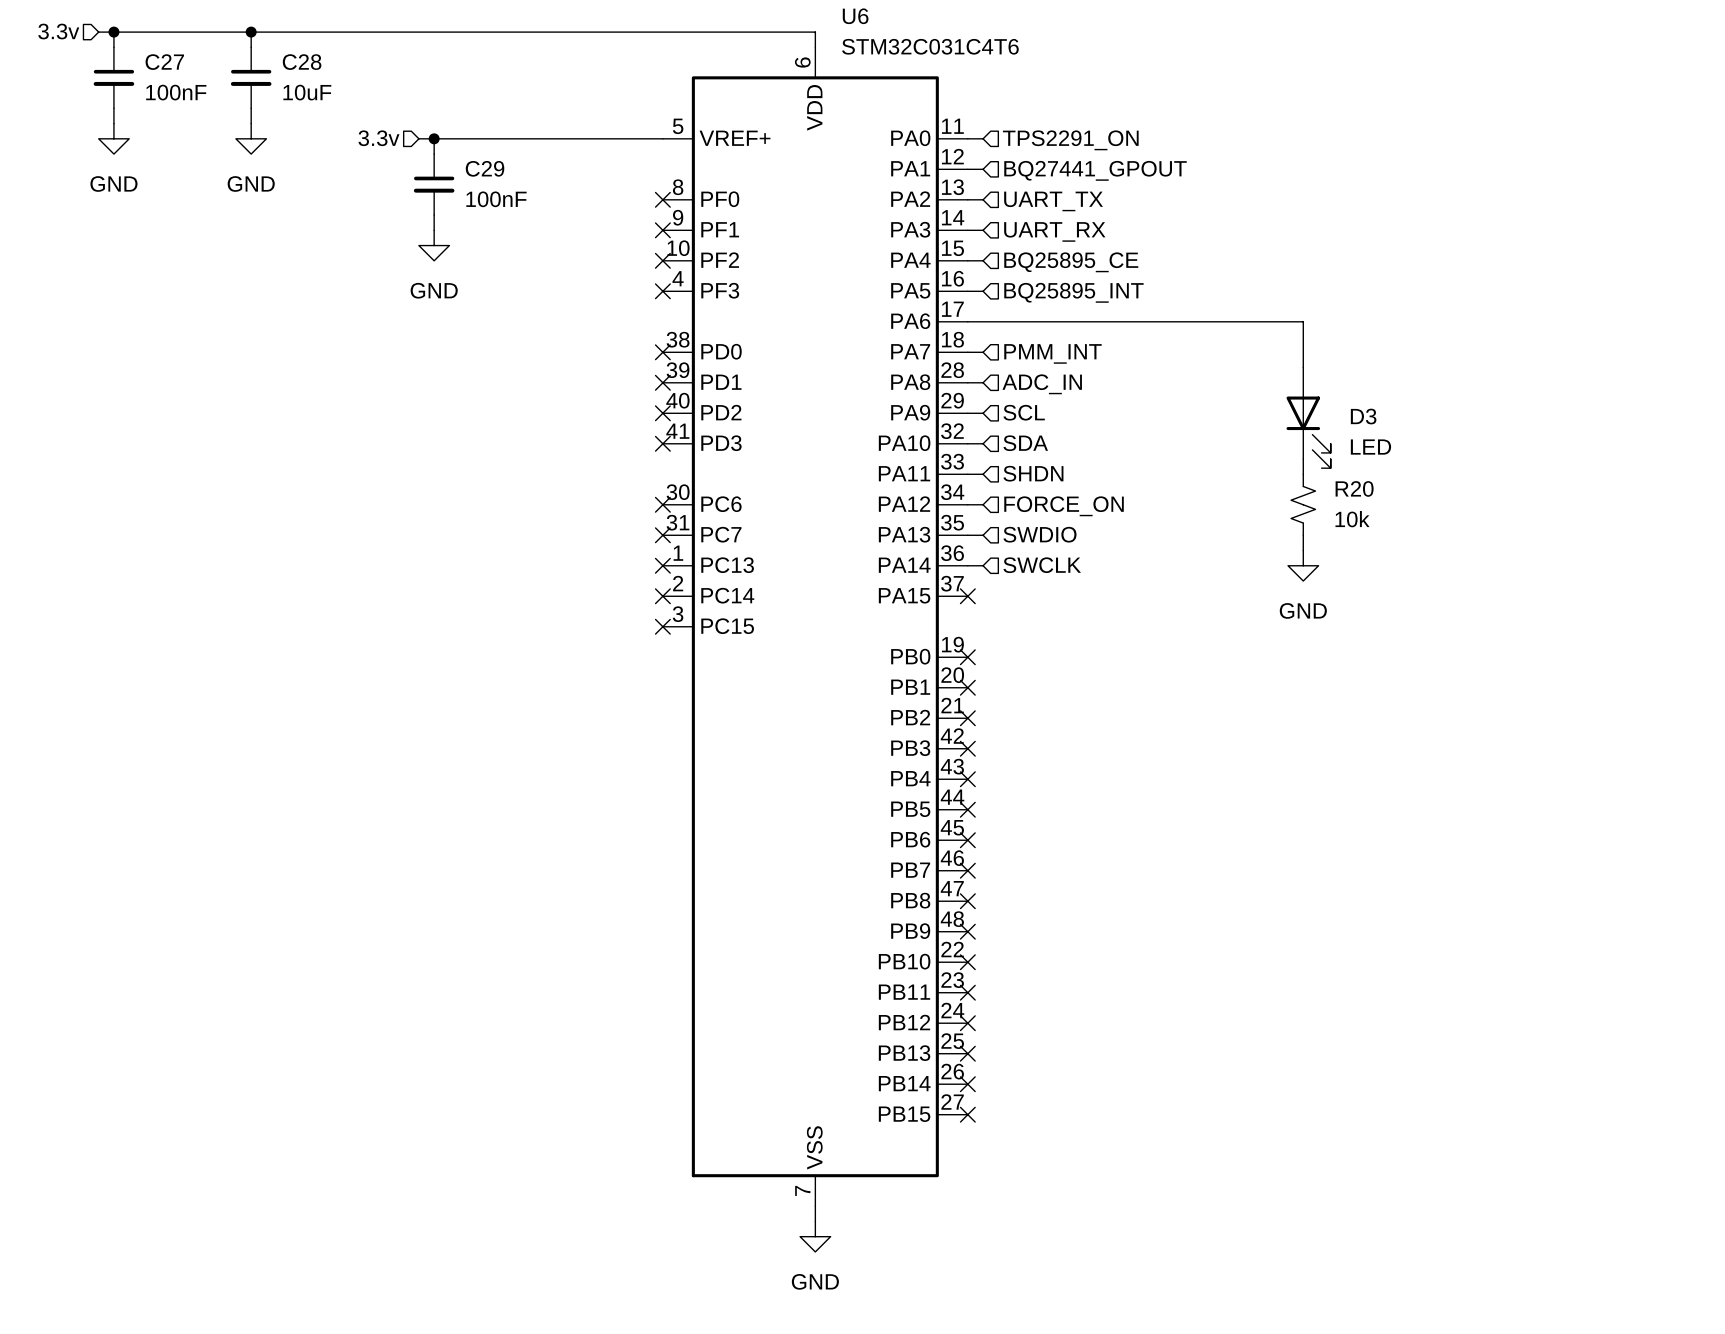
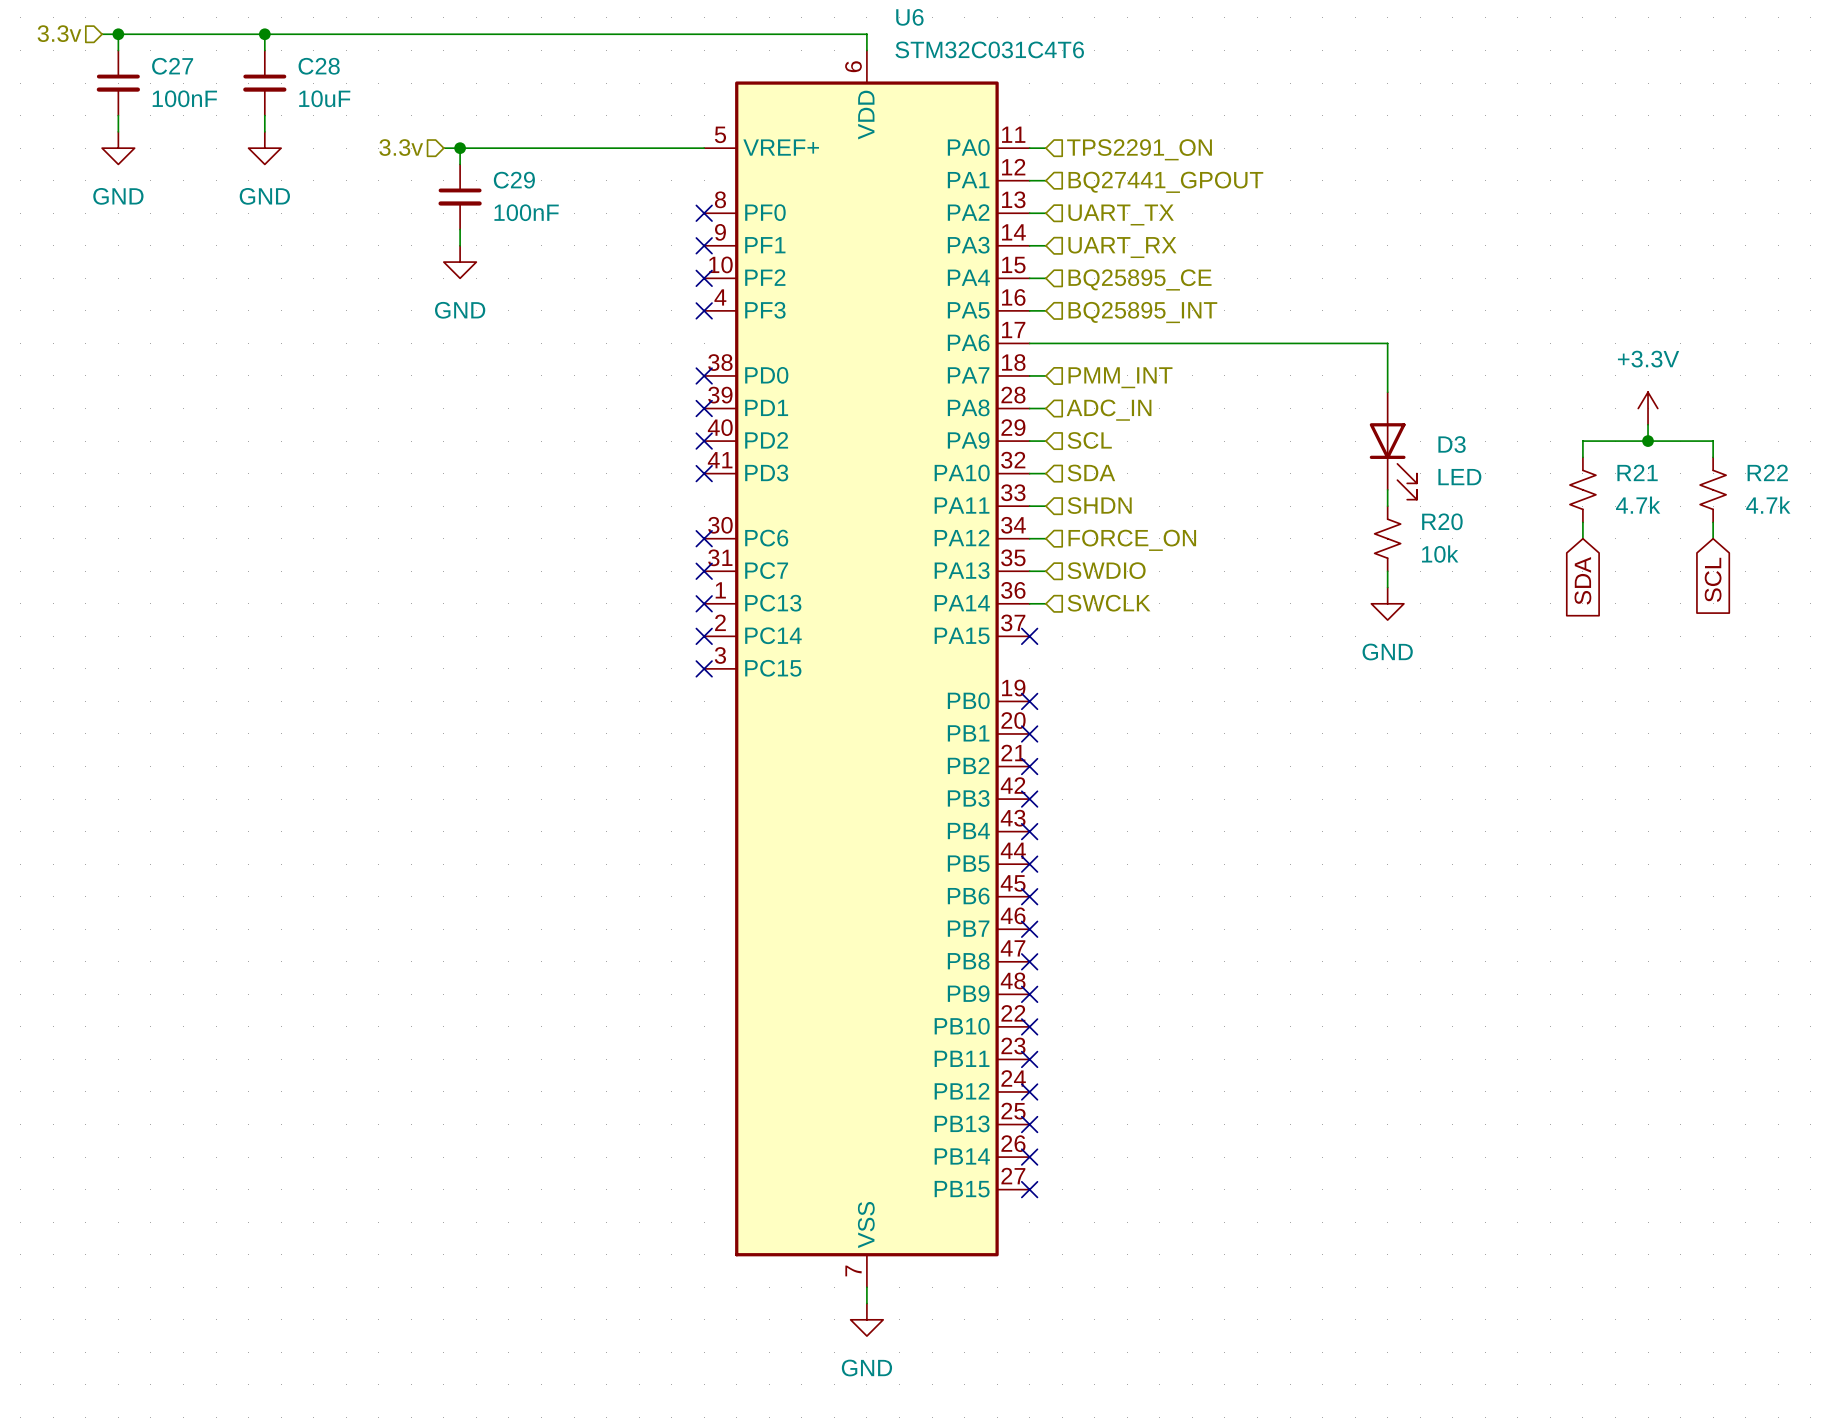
power symbol: none -> +3.3V (1648, 408)
wire: none -> (1648, 424) (1648, 441)
junction: none -> (1648, 441)
wire: none -> (1582, 457) (1582, 441) (1713, 441) (1713, 457)
R21: none -> 4.7k (1582, 489)
R22: none -> 4.7k (1713, 489)
wire: none -> (1582, 522) (1582, 538)
wire: none -> (1713, 522) (1713, 538)
global label: none -> SCL (1713, 579)
global label: none -> SDA (1582, 580)

